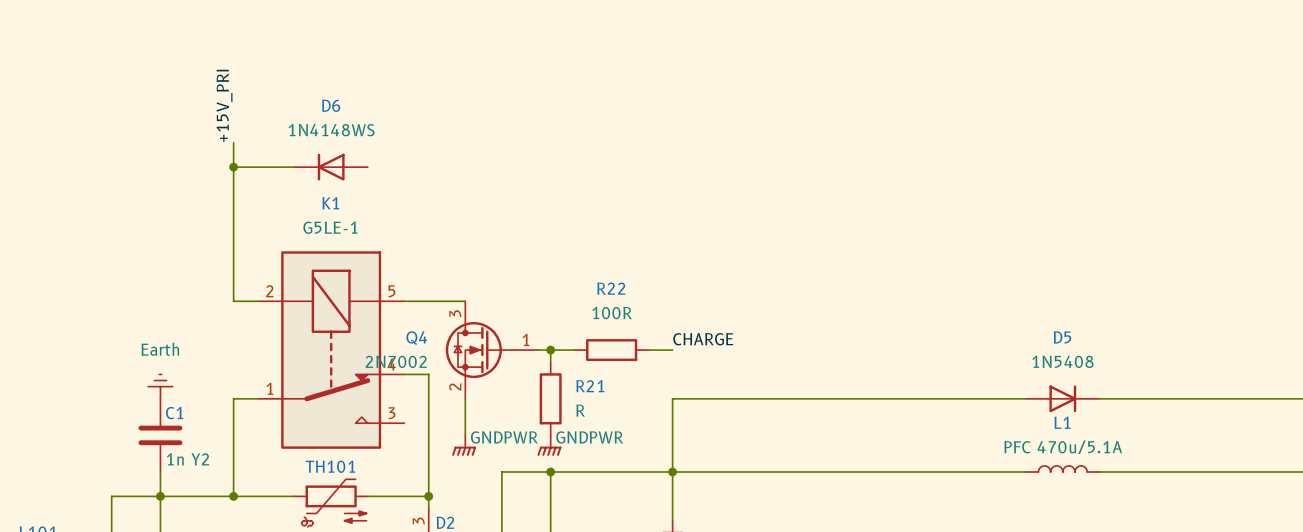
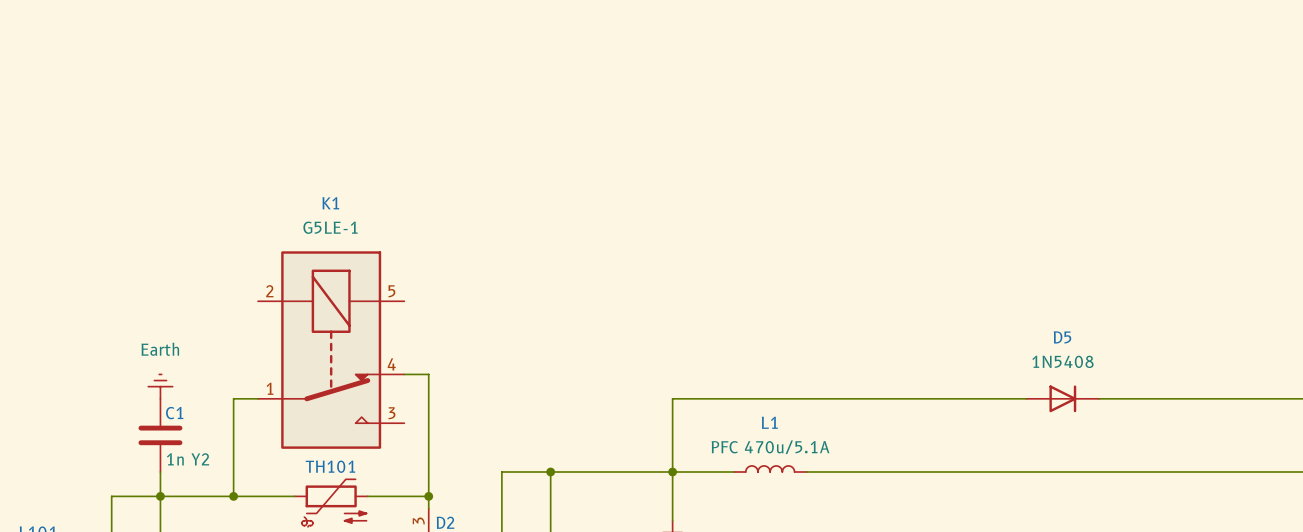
label: +15V_PRI (224, 105) -> none
wire: (233, 142) (233, 301) (258, 301) -> none
wire: (233, 167) (294, 167) -> none
junction: (233, 167) -> none
D6: 1N4148WS (331, 167) -> none
wire: (404, 301) (465, 301) -> none
label: CHARGE (703, 339) -> none
Q4: 2N7002 (492, 350) -> none
wire: (538, 350) (575, 350) -> none
wire: (550, 350) (550, 362) -> none
junction: (550, 350) -> none
R22: 100R (611, 350) -> none
wire: (648, 350) (672, 350) -> none
wire: (465, 398) (465, 435) -> none
R21: R (550, 398) -> none
power symbol: GNDPWR (464, 445) -> none
power symbol: GNDPWR (549, 445) -> none
L1 position: (1062, 468) -> (770, 468)
wire: (733, 472) (806, 472) -> none
wire: none -> (1026, 472) (1099, 472)

